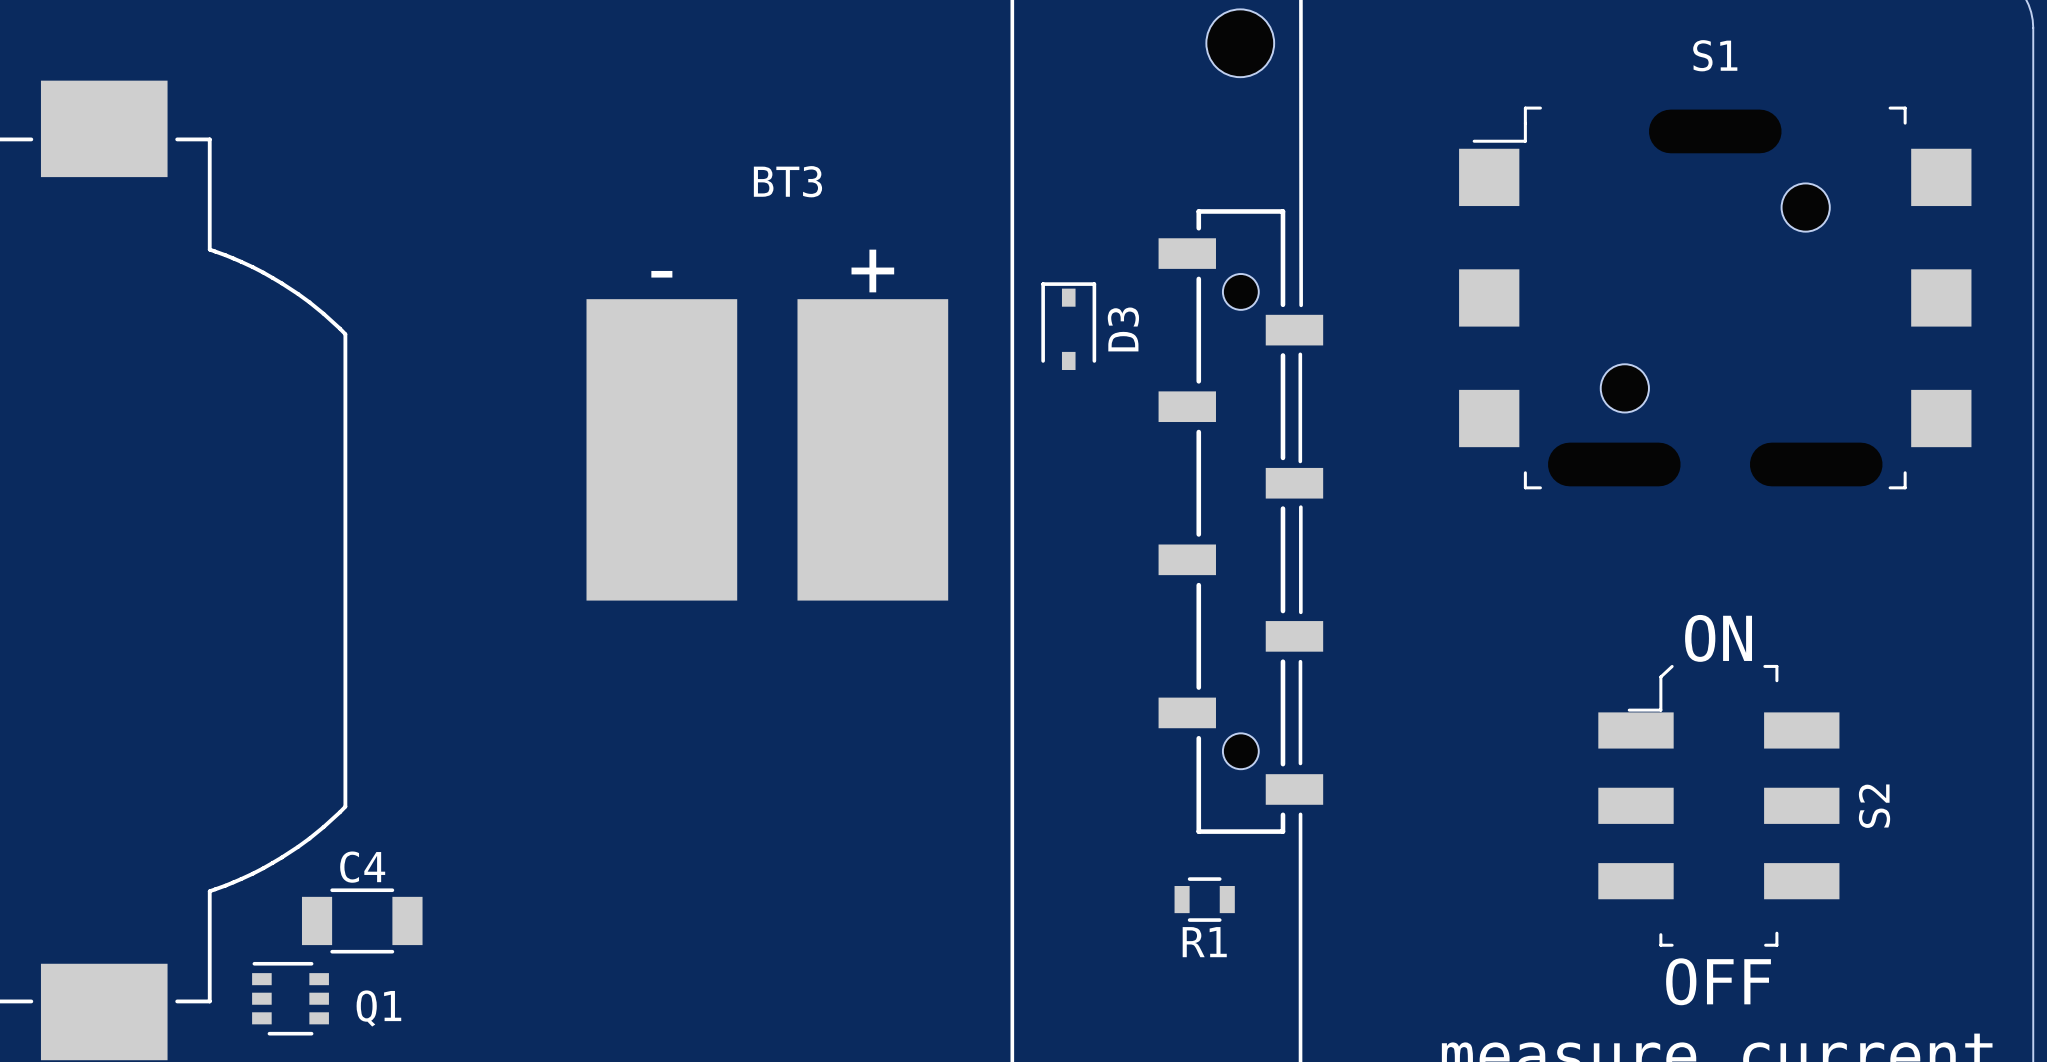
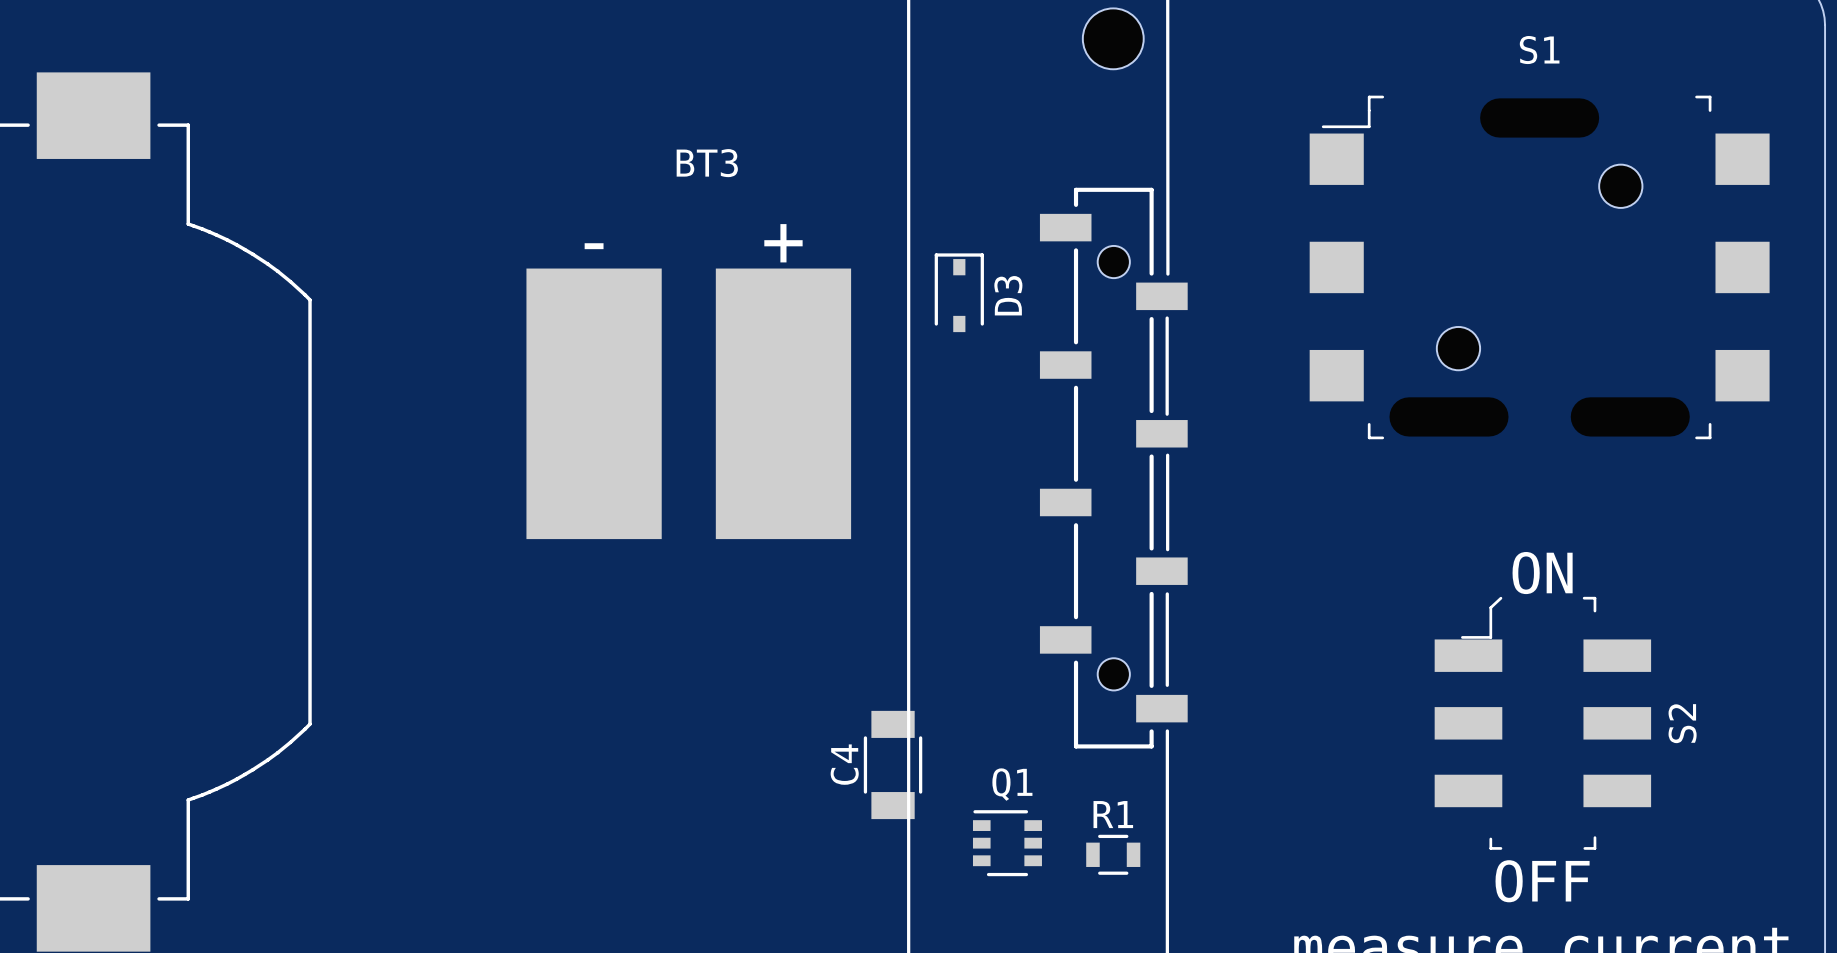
C4 name position: C4 (362, 867) -> C4 (844, 764)
R1 position: (1204, 899) -> (1113, 854)
C4 rotation: 0° (362, 920) -> 90° clockwise (893, 764)
C4 position: (362, 920) -> (893, 764)
R1 name position: R1 (1204, 942) -> R1 (1113, 814)
Q1 position: (290, 998) -> (1007, 843)
Q1 name position: Q1 (378, 1008) -> Q1 (1012, 784)

